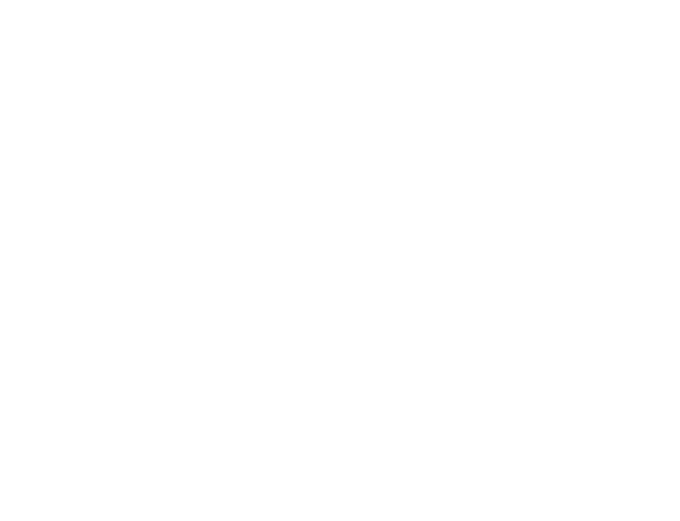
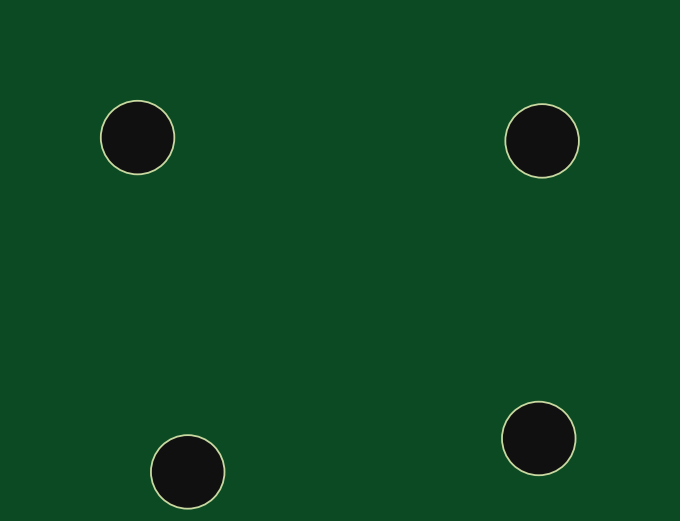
part: none -> (137, 137)
part: none -> (542, 140)
part: none -> (538, 438)
part: none -> (187, 471)

